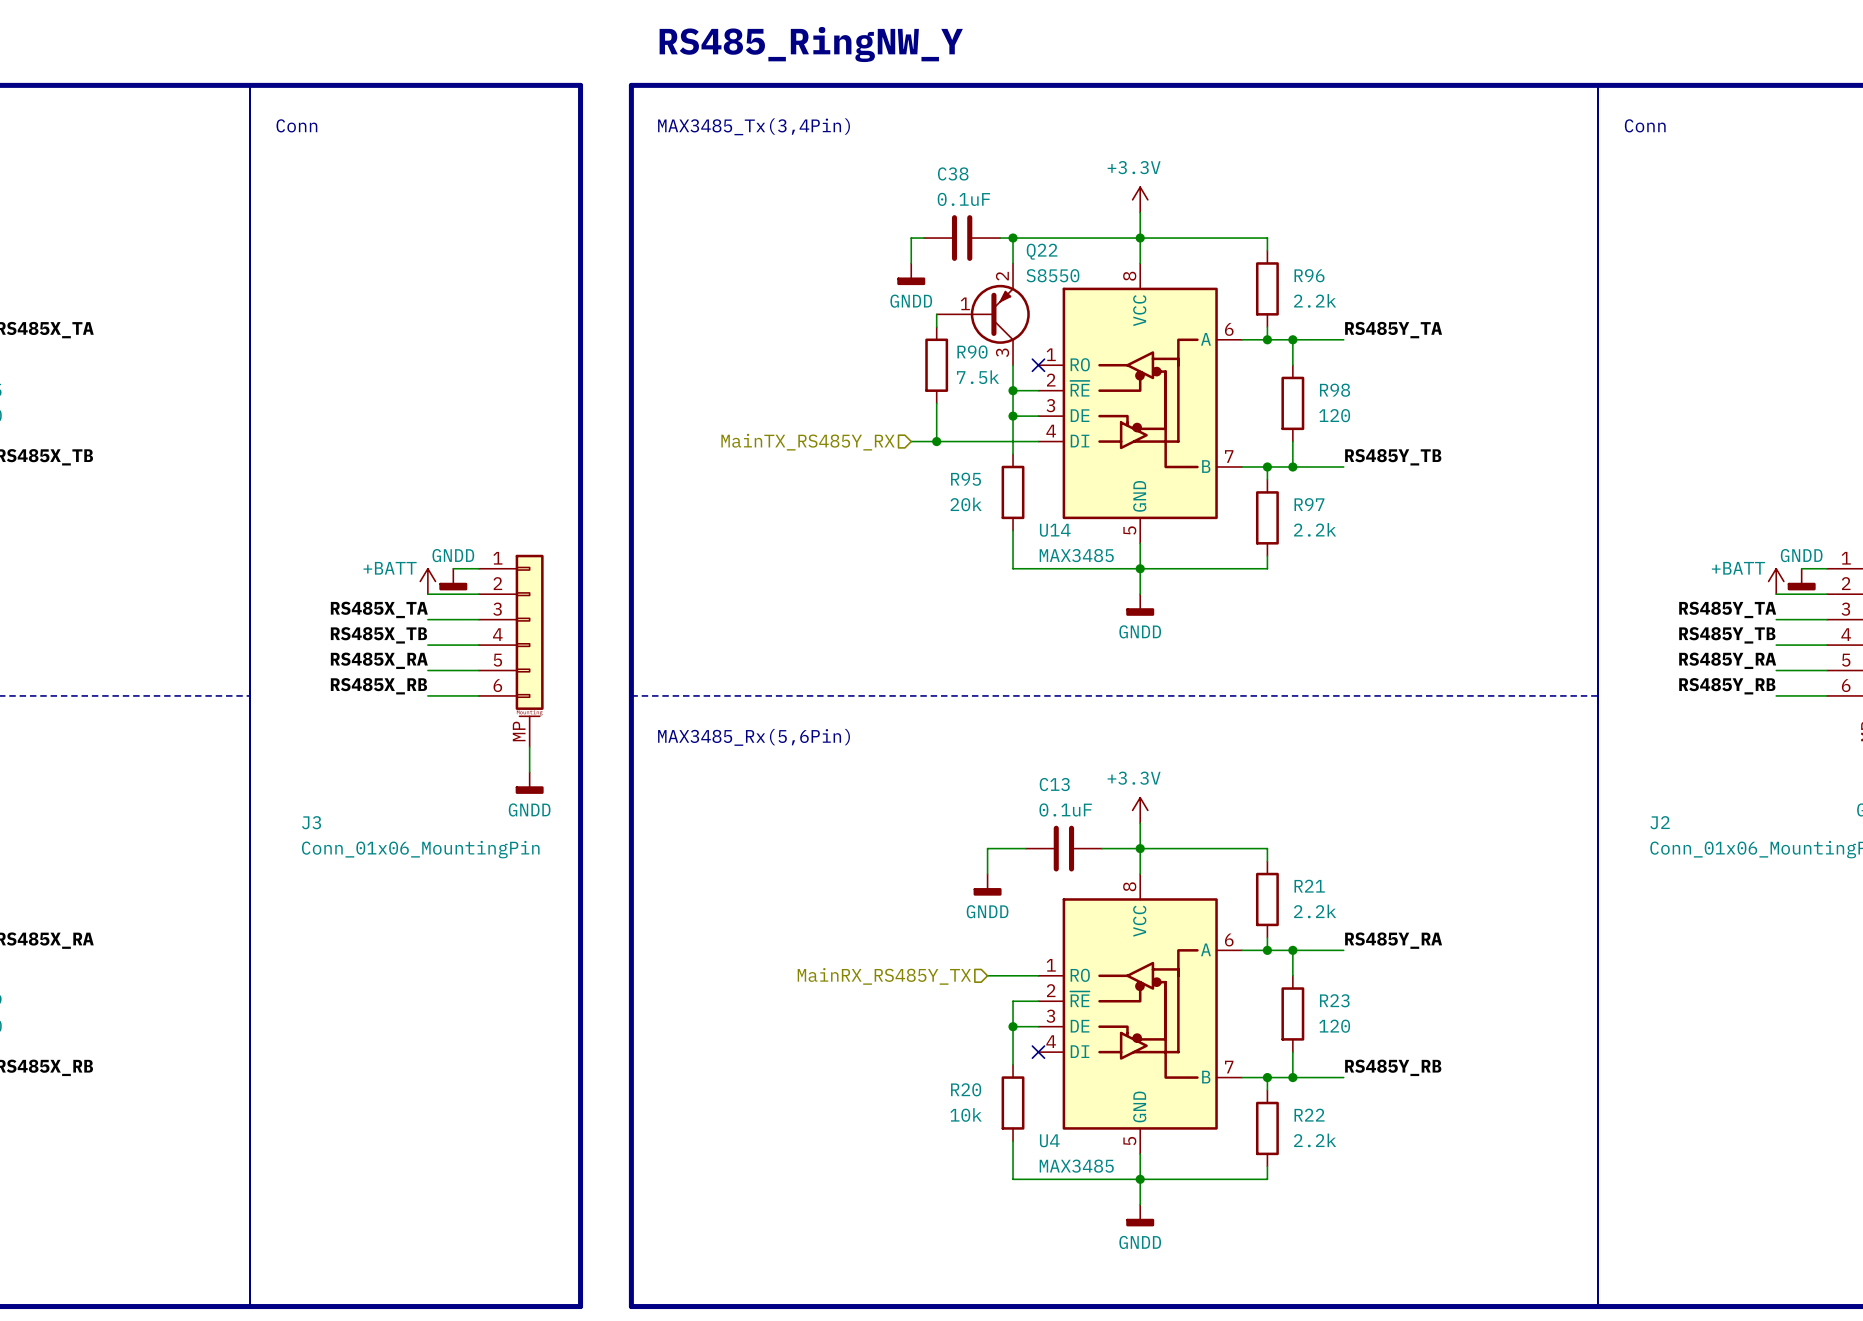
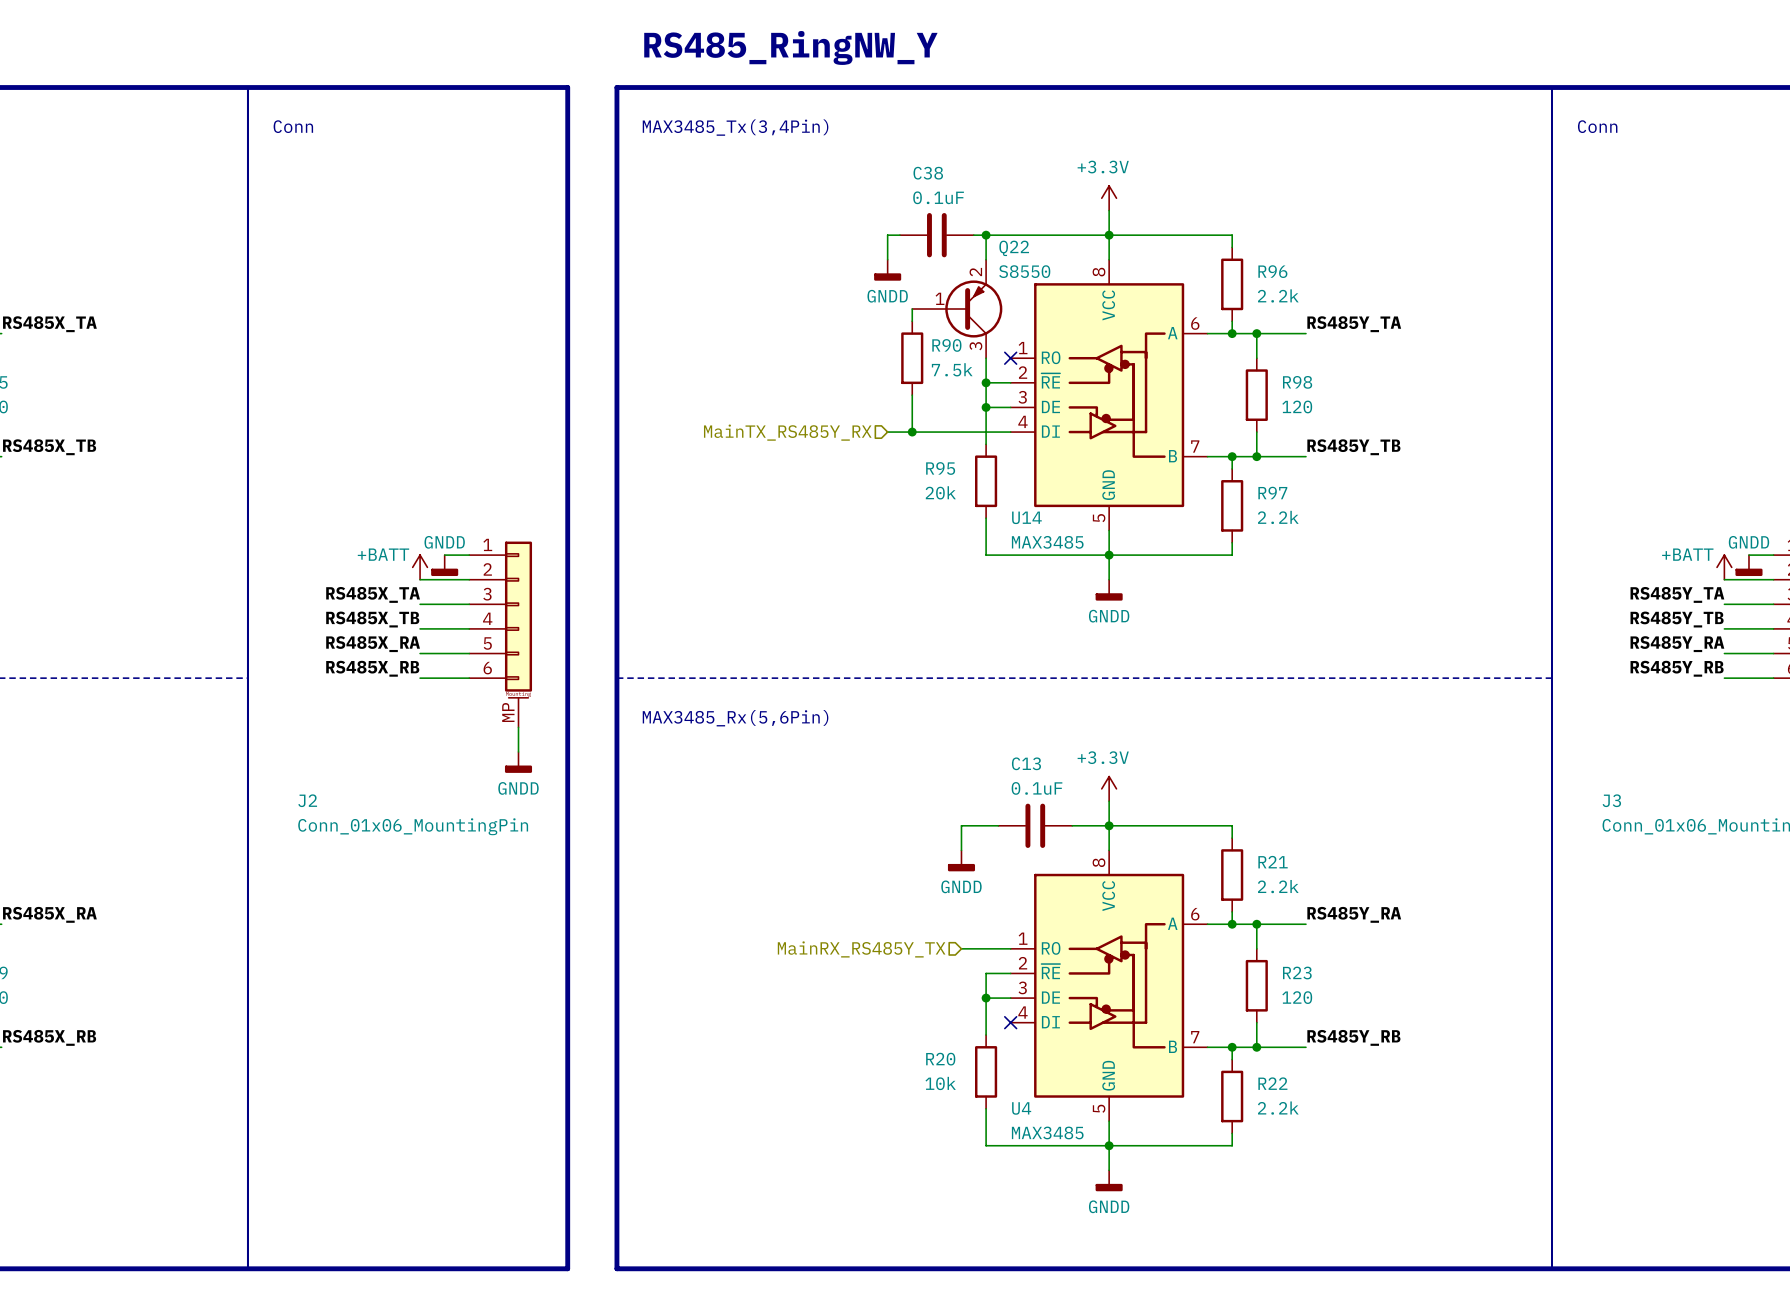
J3 name: J3 (311, 822) -> J2 (307, 800)
J2 name: J2 (1660, 822) -> J3 (1611, 800)

